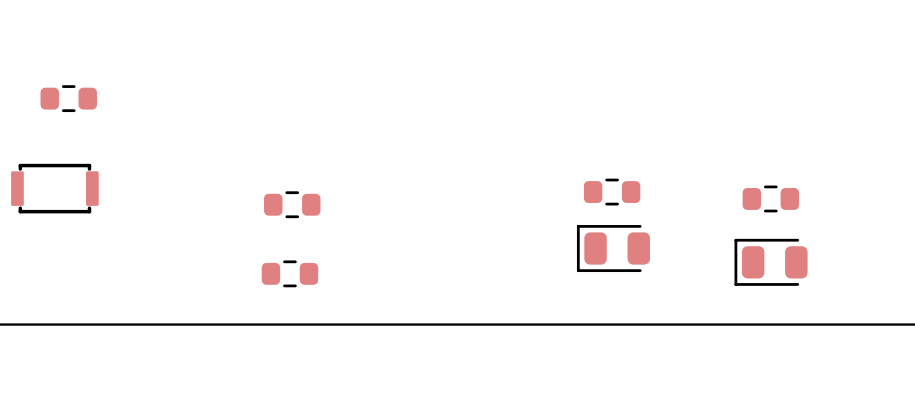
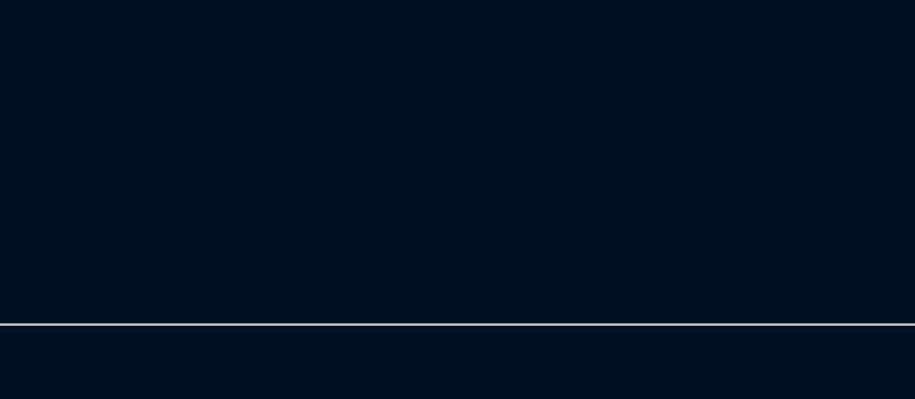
part: (68, 98) -> none
part: (54, 188) -> none
part: (612, 192) -> none
part: (770, 198) -> none
part: (292, 204) -> none
part: (613, 248) -> none
part: (771, 262) -> none
part: (289, 273) -> none

